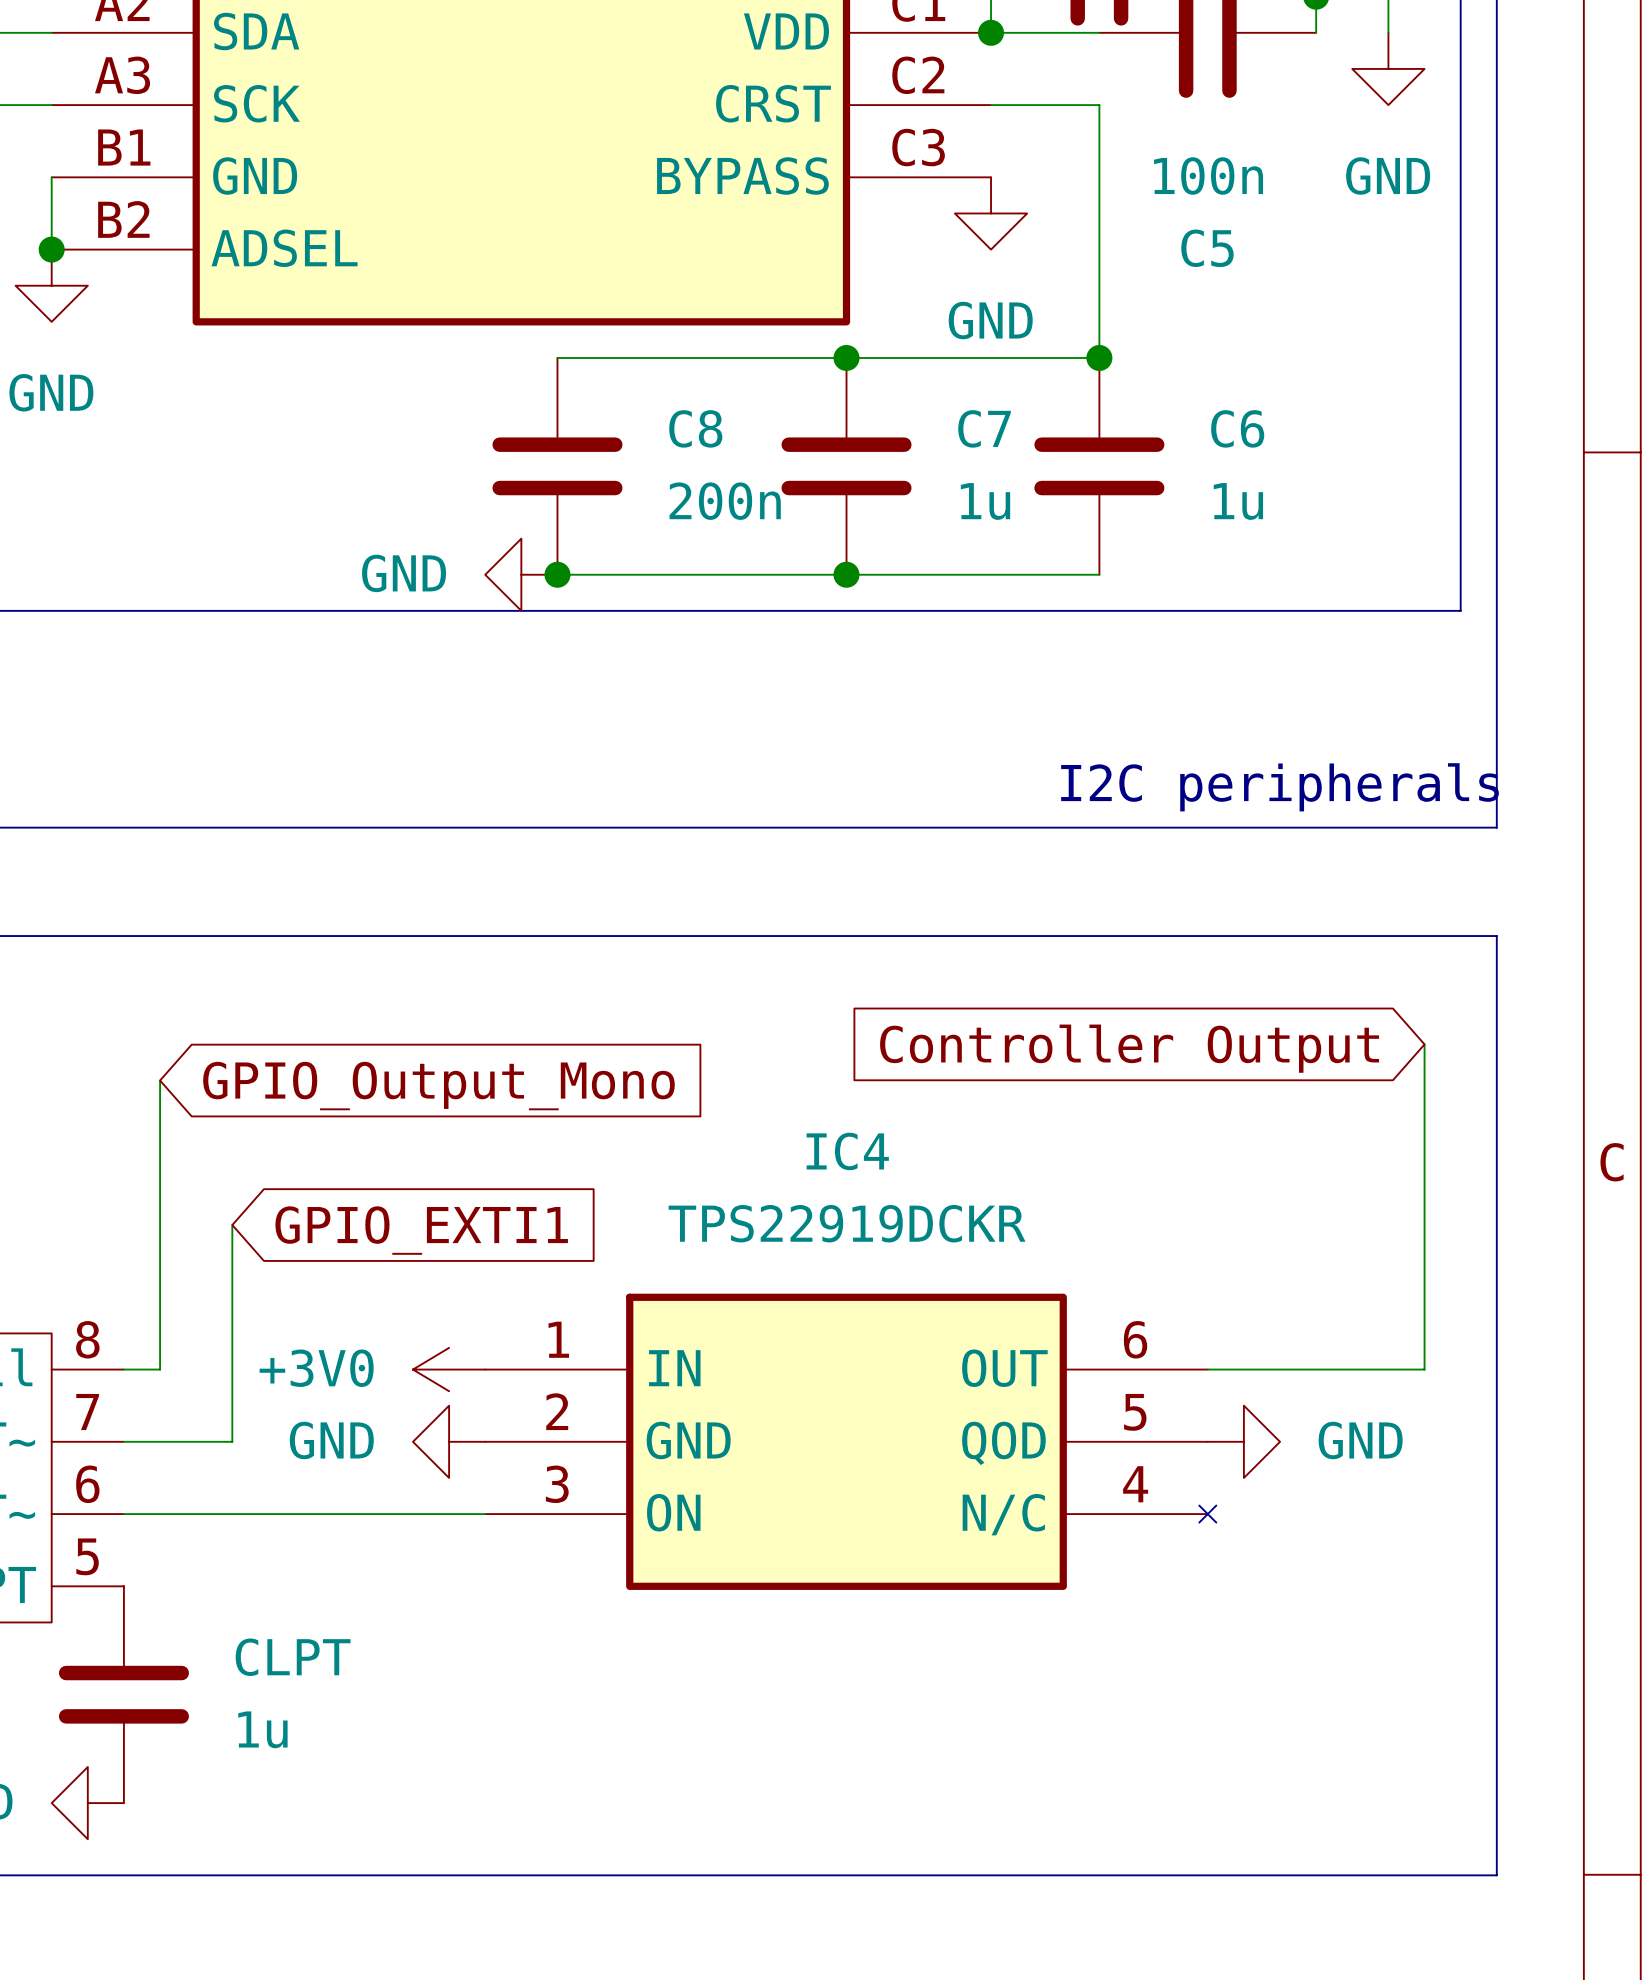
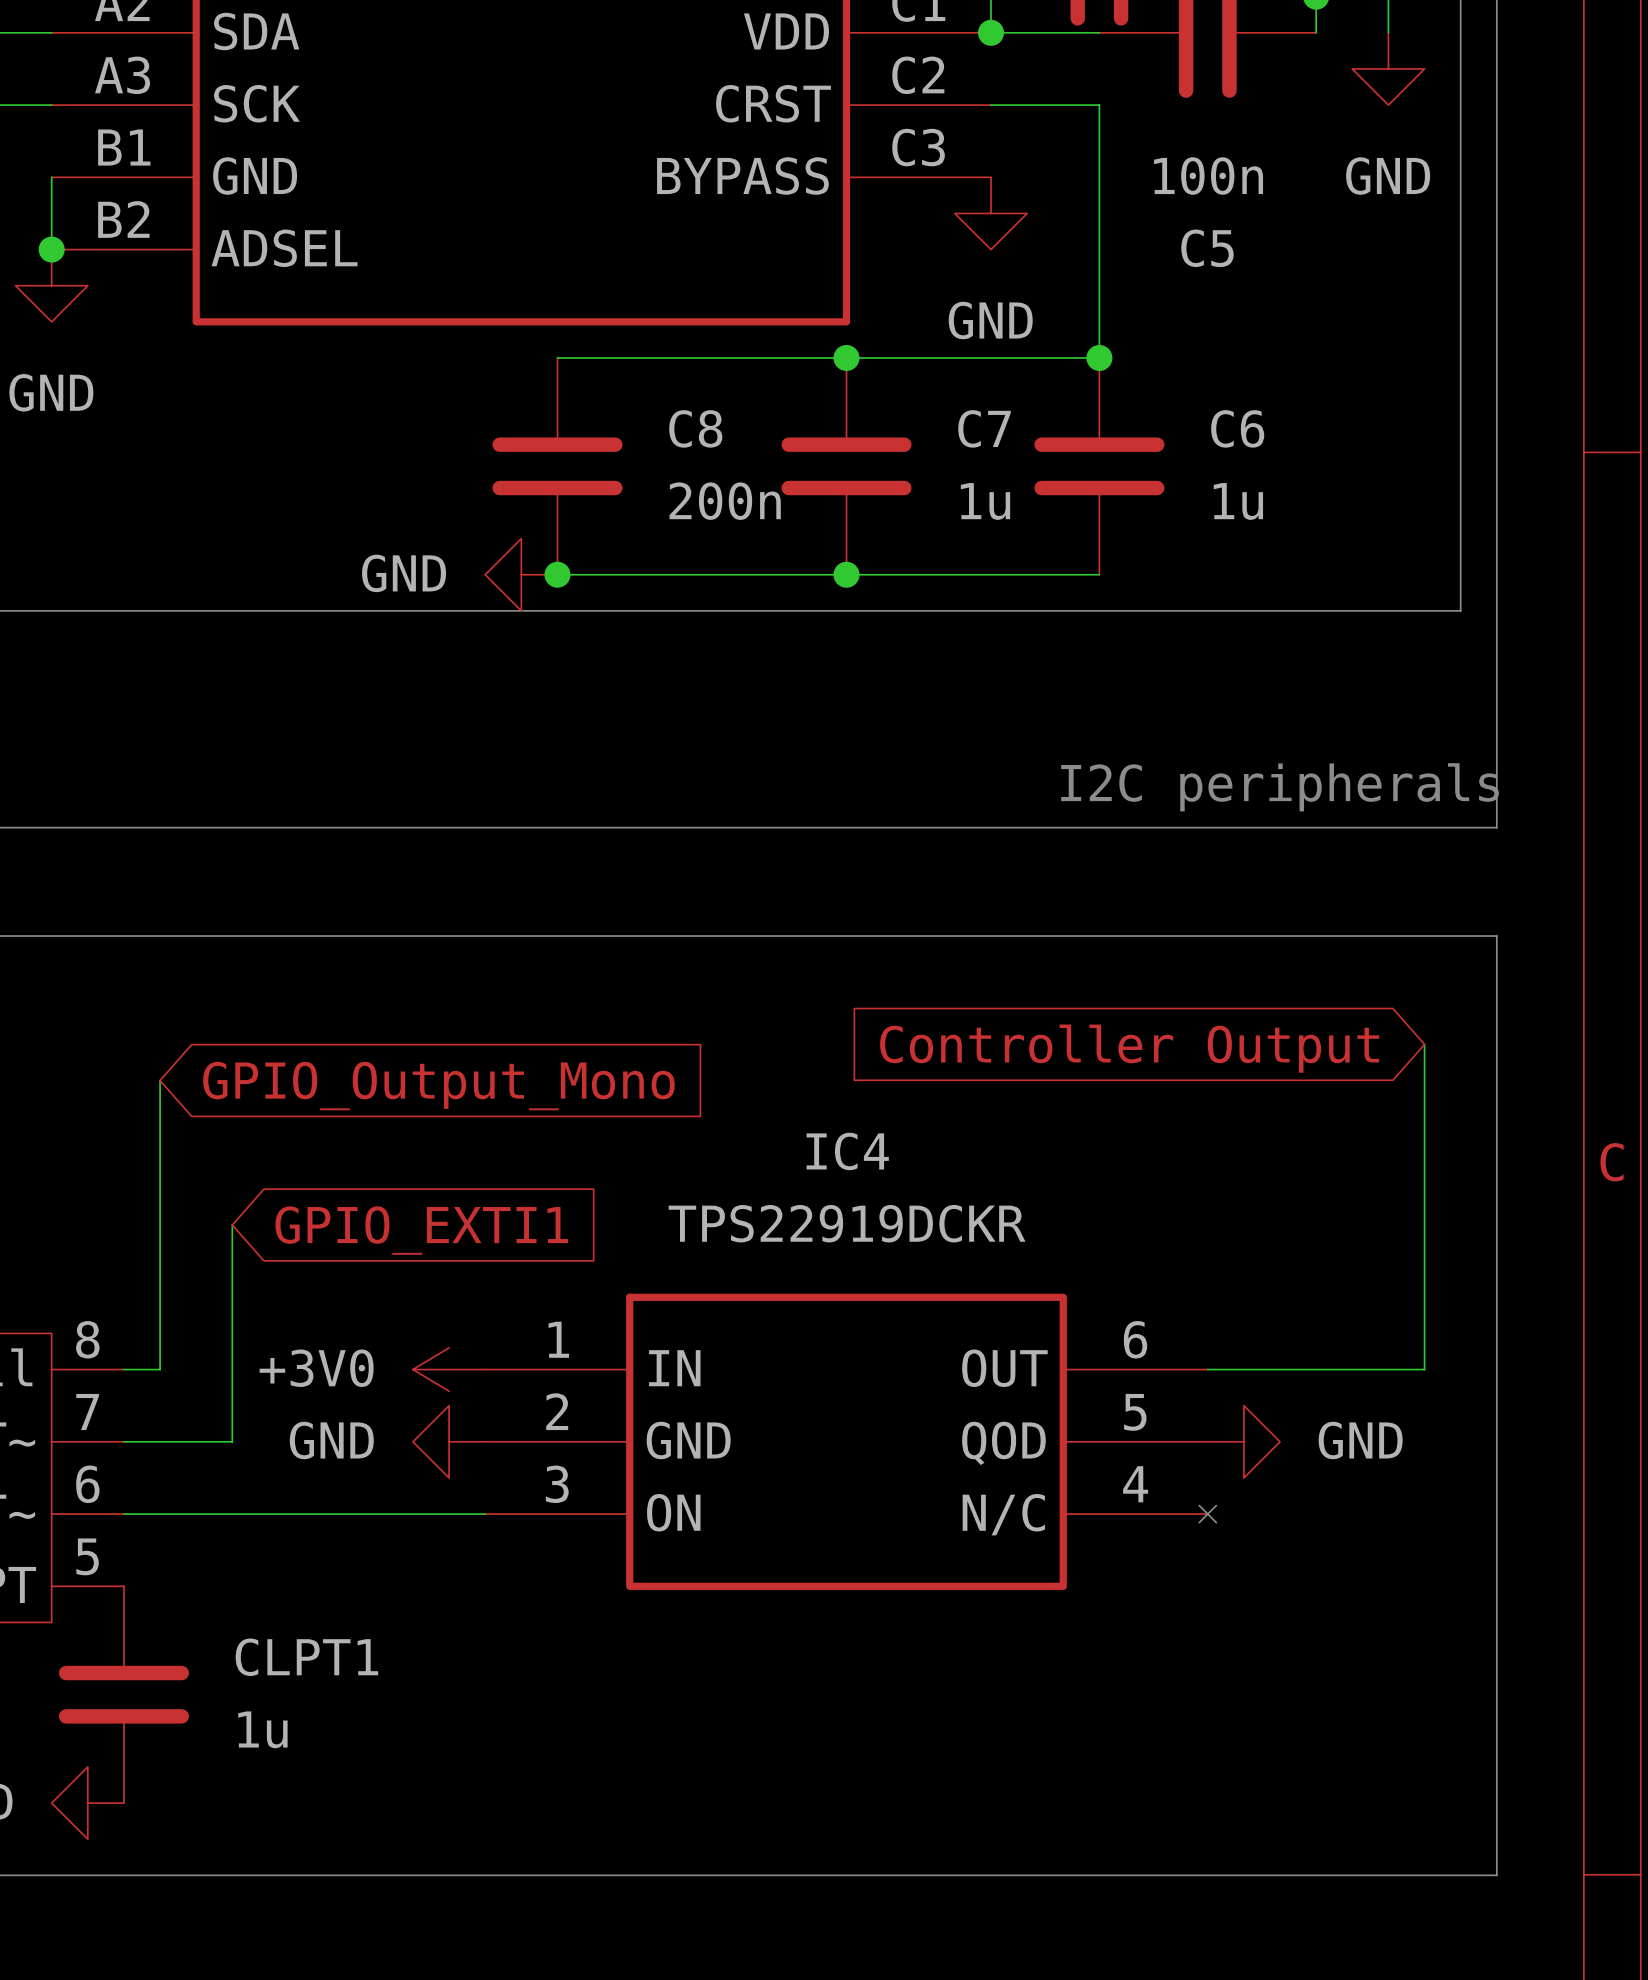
CLPT name: CLPT (293, 1657) -> CLPT1 (306, 1657)

